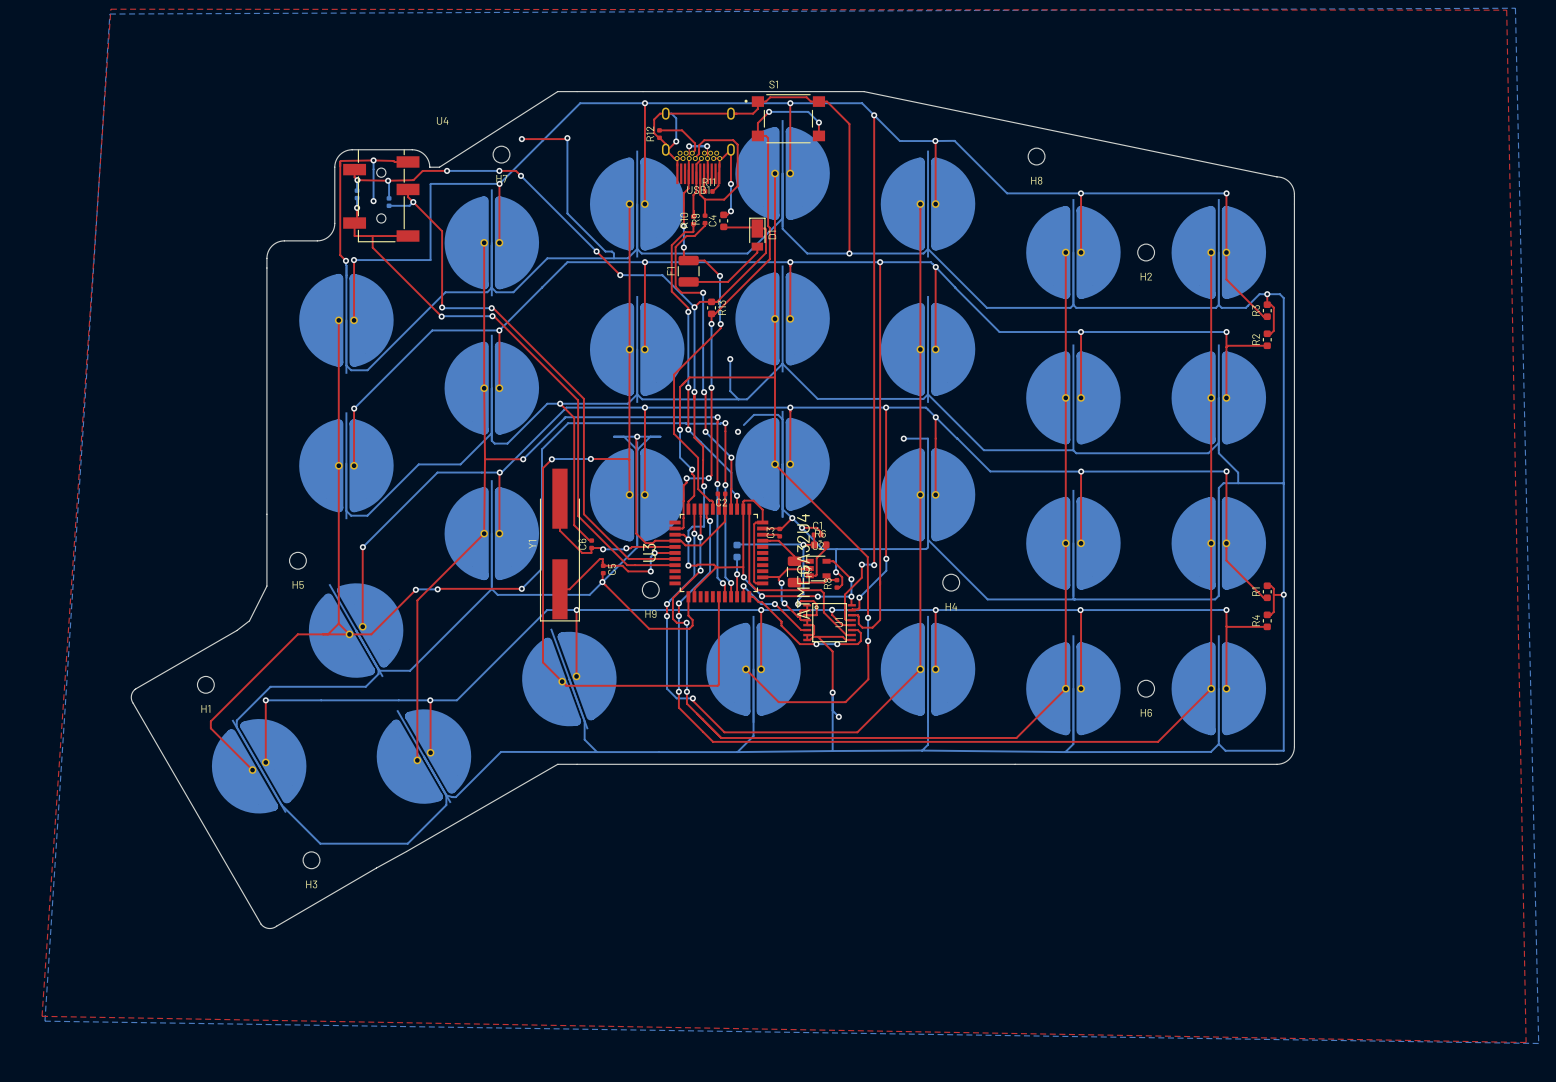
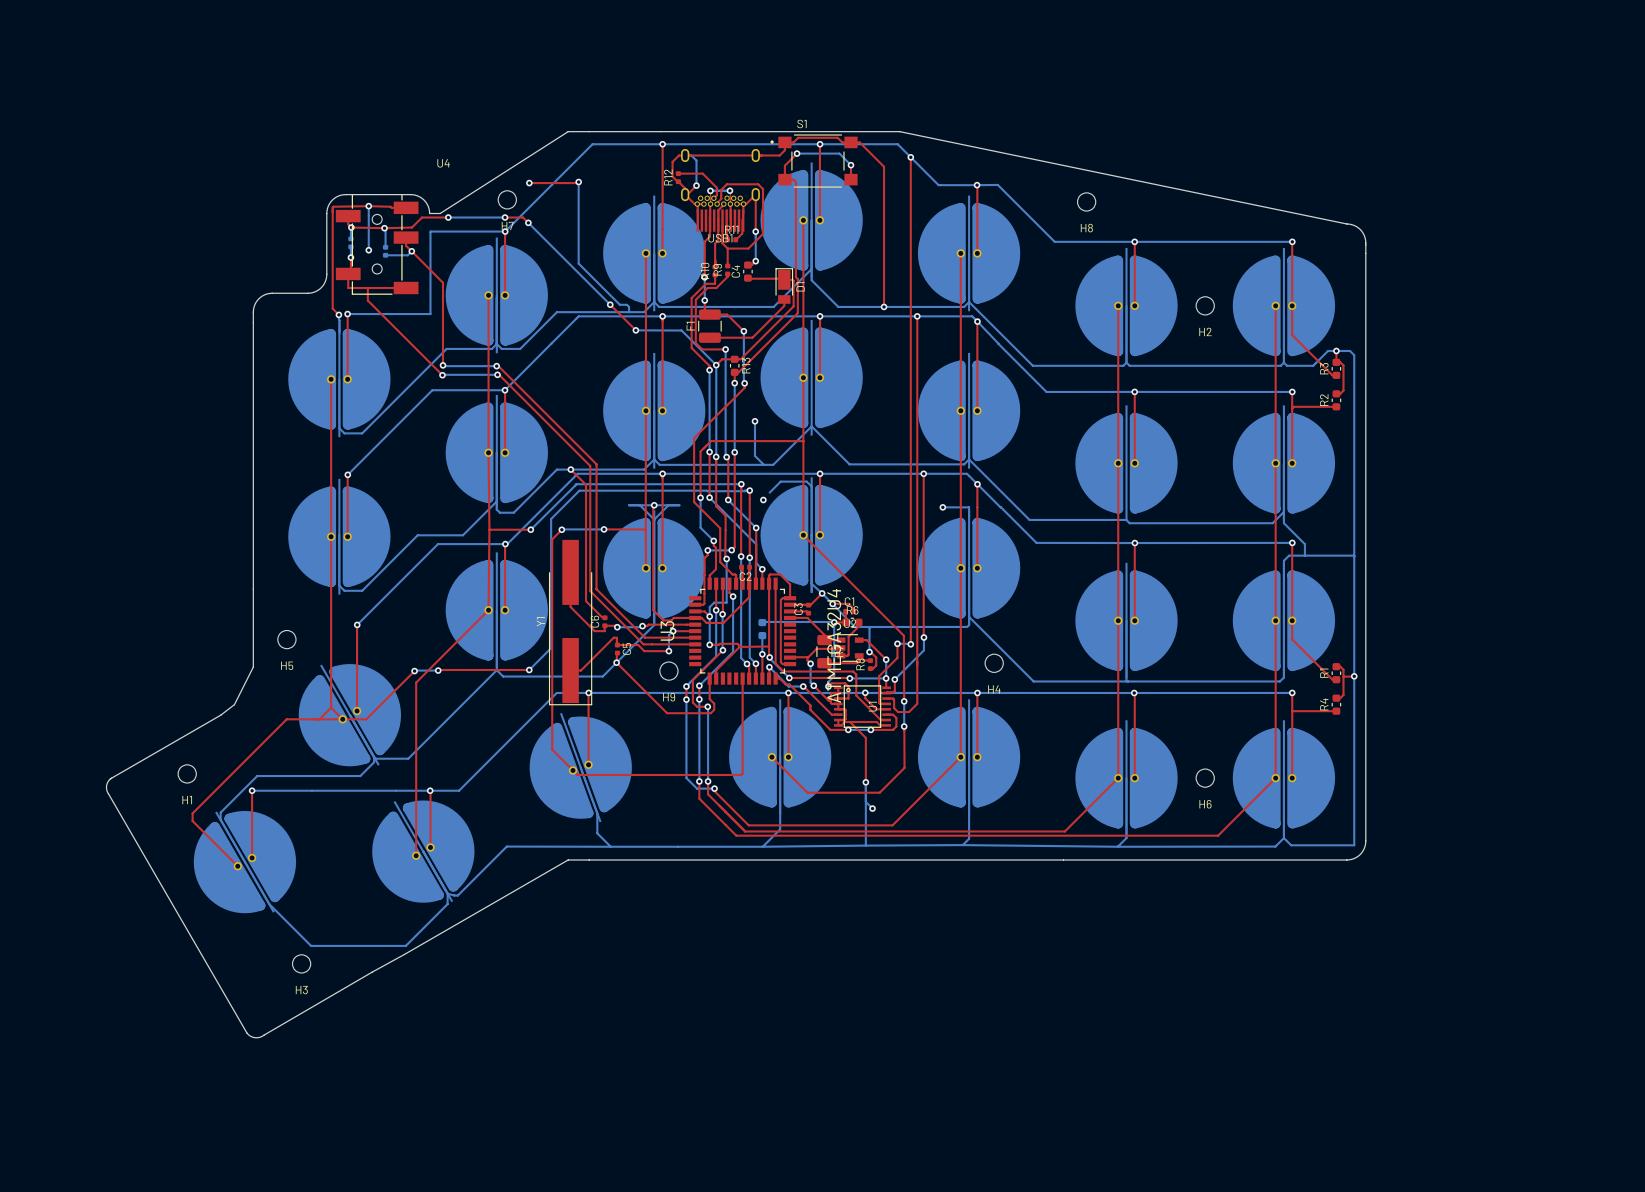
bottom zone outline: (1515, 8) (109, 14) (44, 1021) (1538, 1043) (1515, 8) -> none
top zone outline: (110, 9) (42, 1016) (1526, 1042) (1506, 10) (110, 9) -> none

